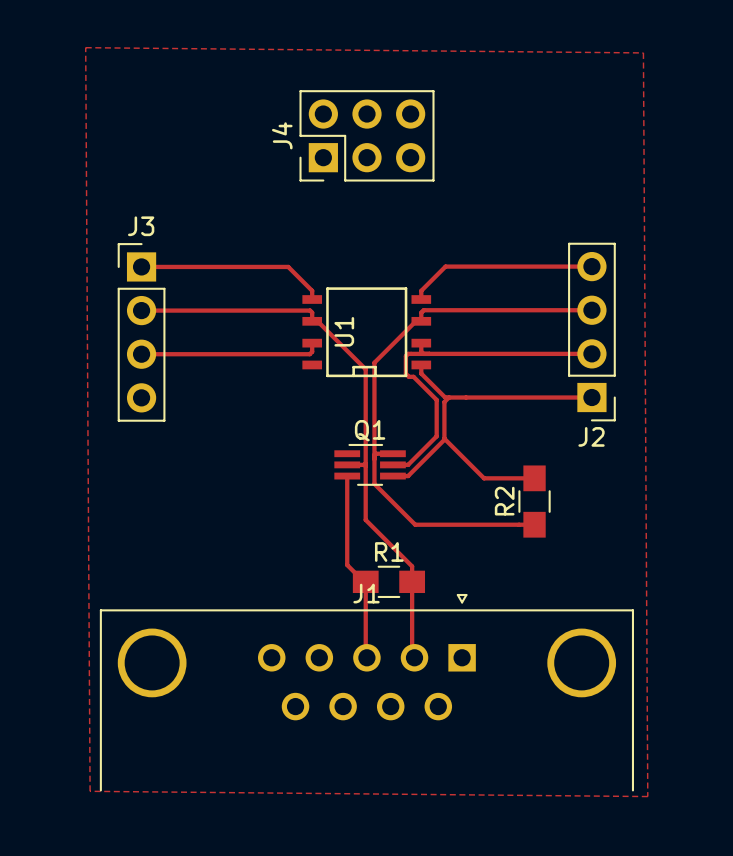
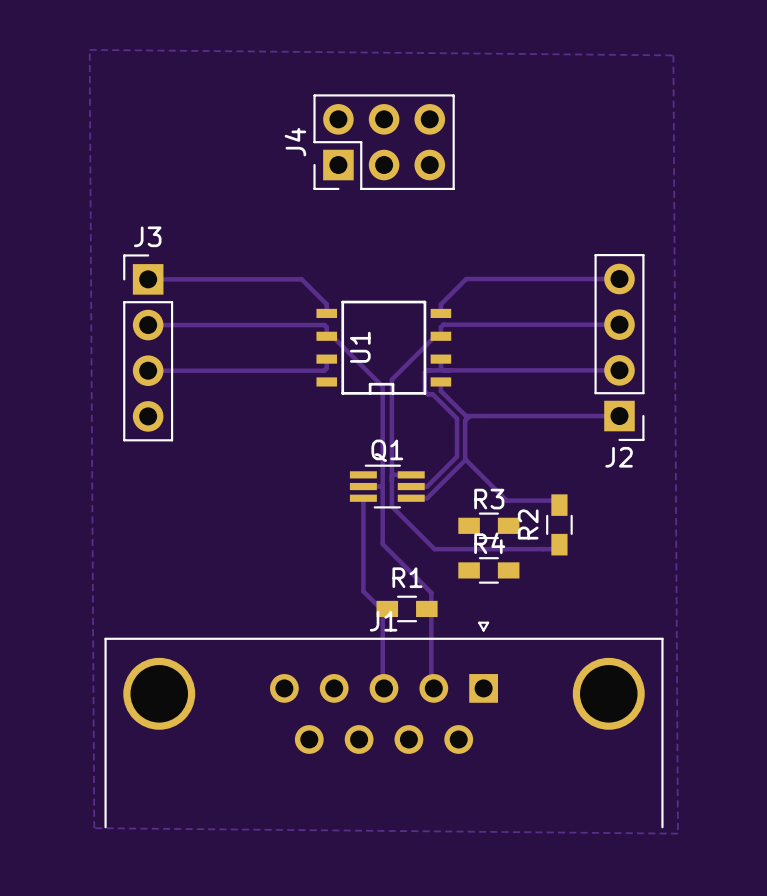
R2 footprint: [518, 465, 551, 538] -> [546, 494, 573, 556]
R3: none -> (488, 525)
R4: none -> (488, 570)
R1 footprint: [352, 565, 426, 599] -> [376, 595, 438, 623]

